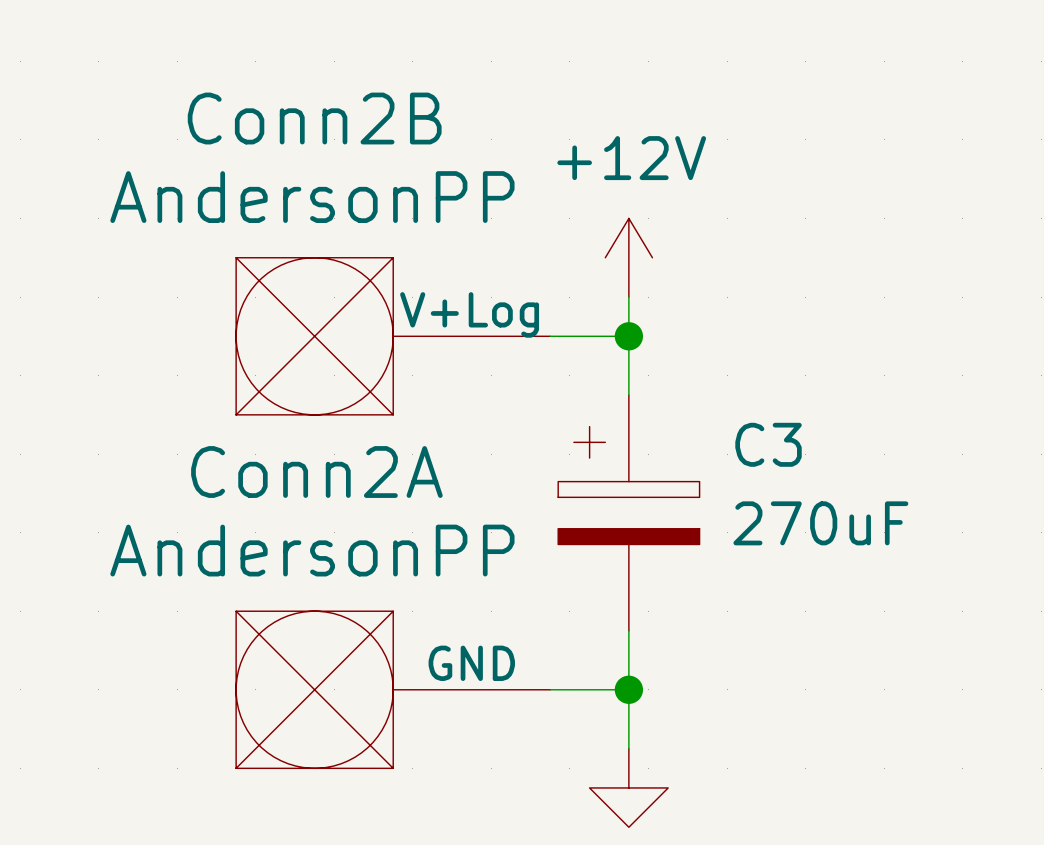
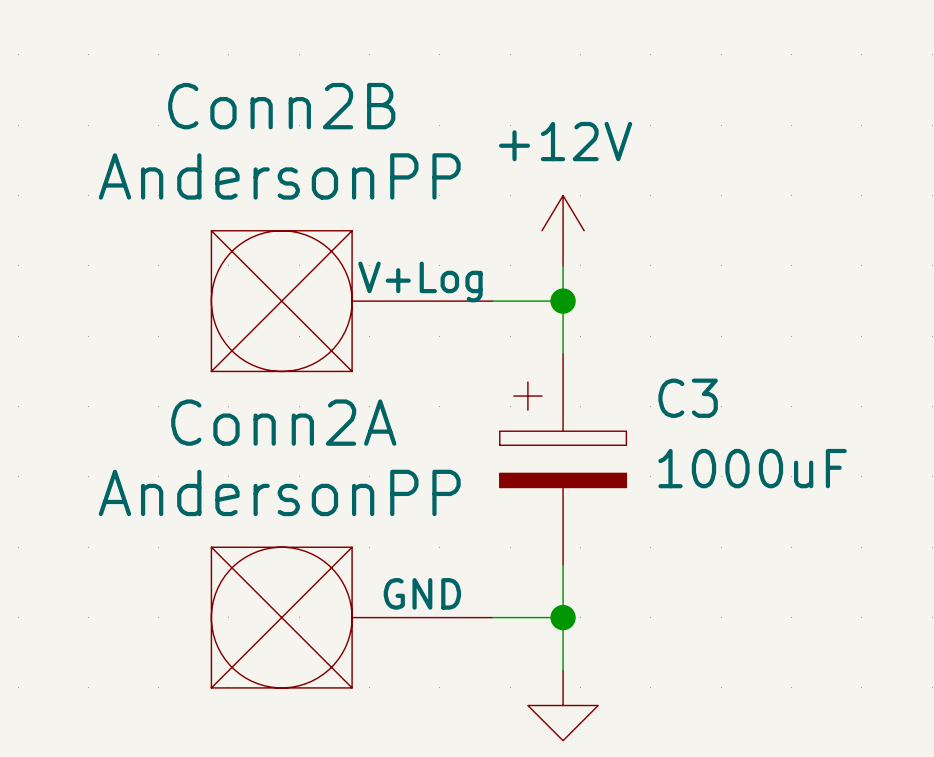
C3 value: 270uF (820, 523) -> 1000uF (752, 468)

